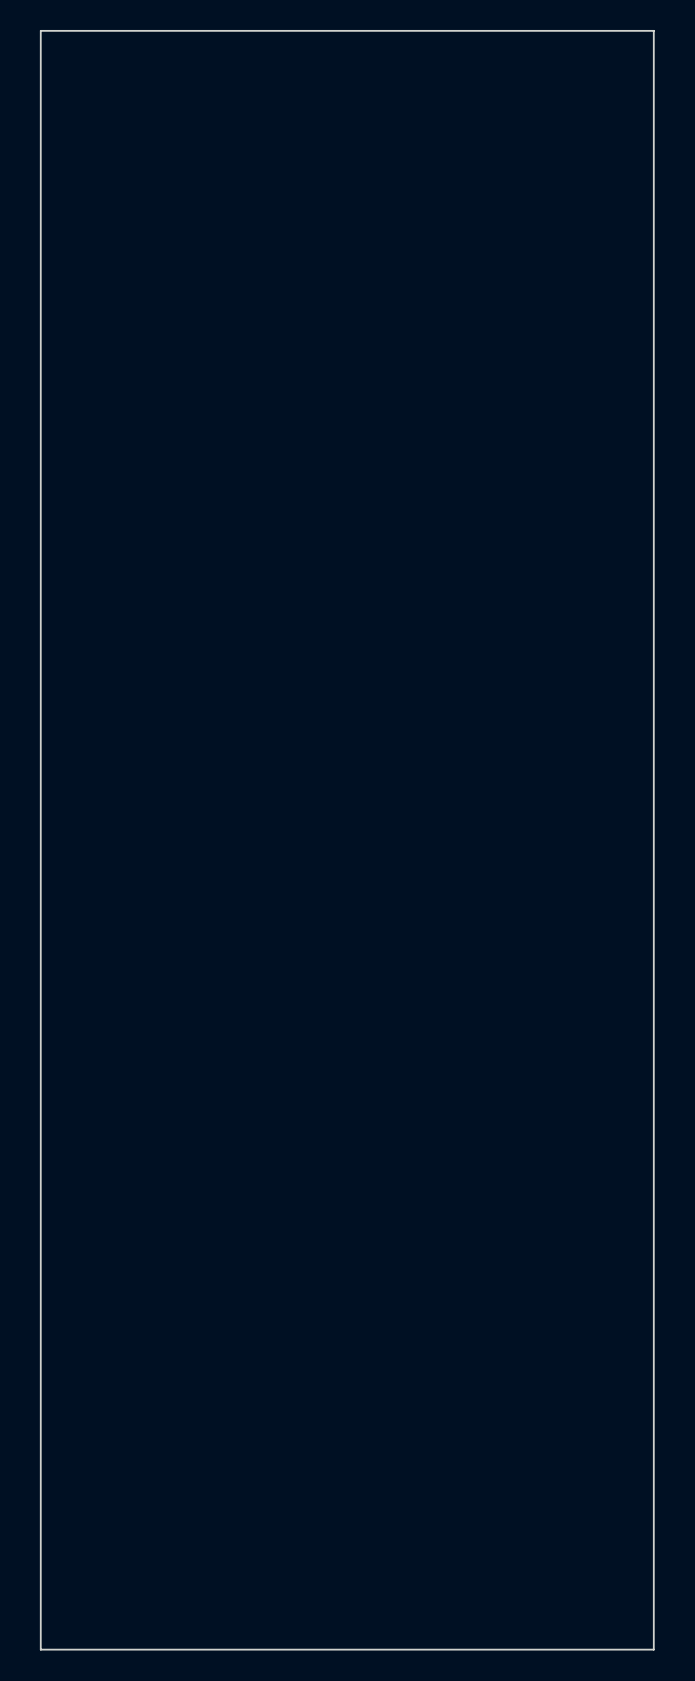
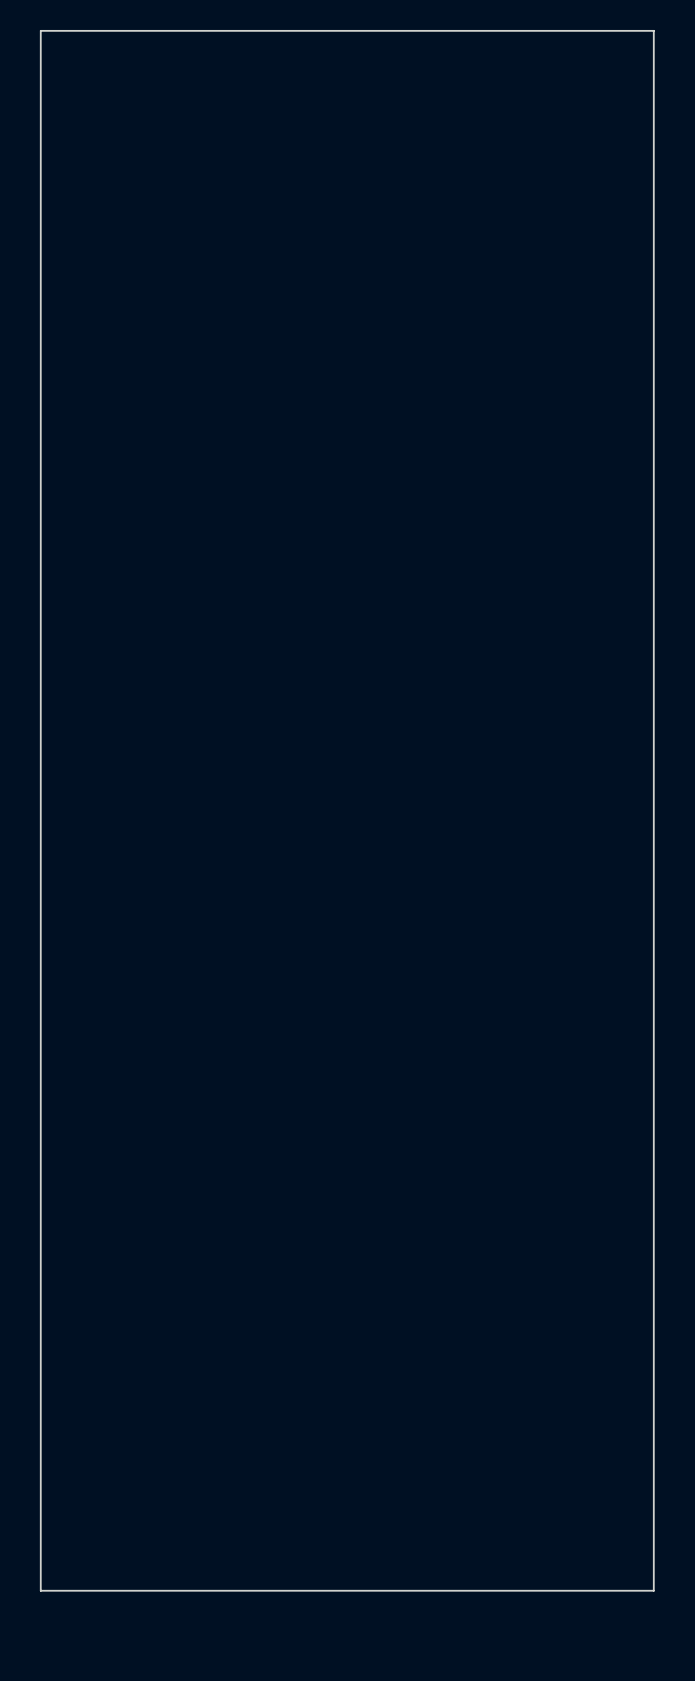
board edge: (40, 1590) (40, 1649) (653, 1649) (653, 1590) -> (40, 1590) (653, 1590)

